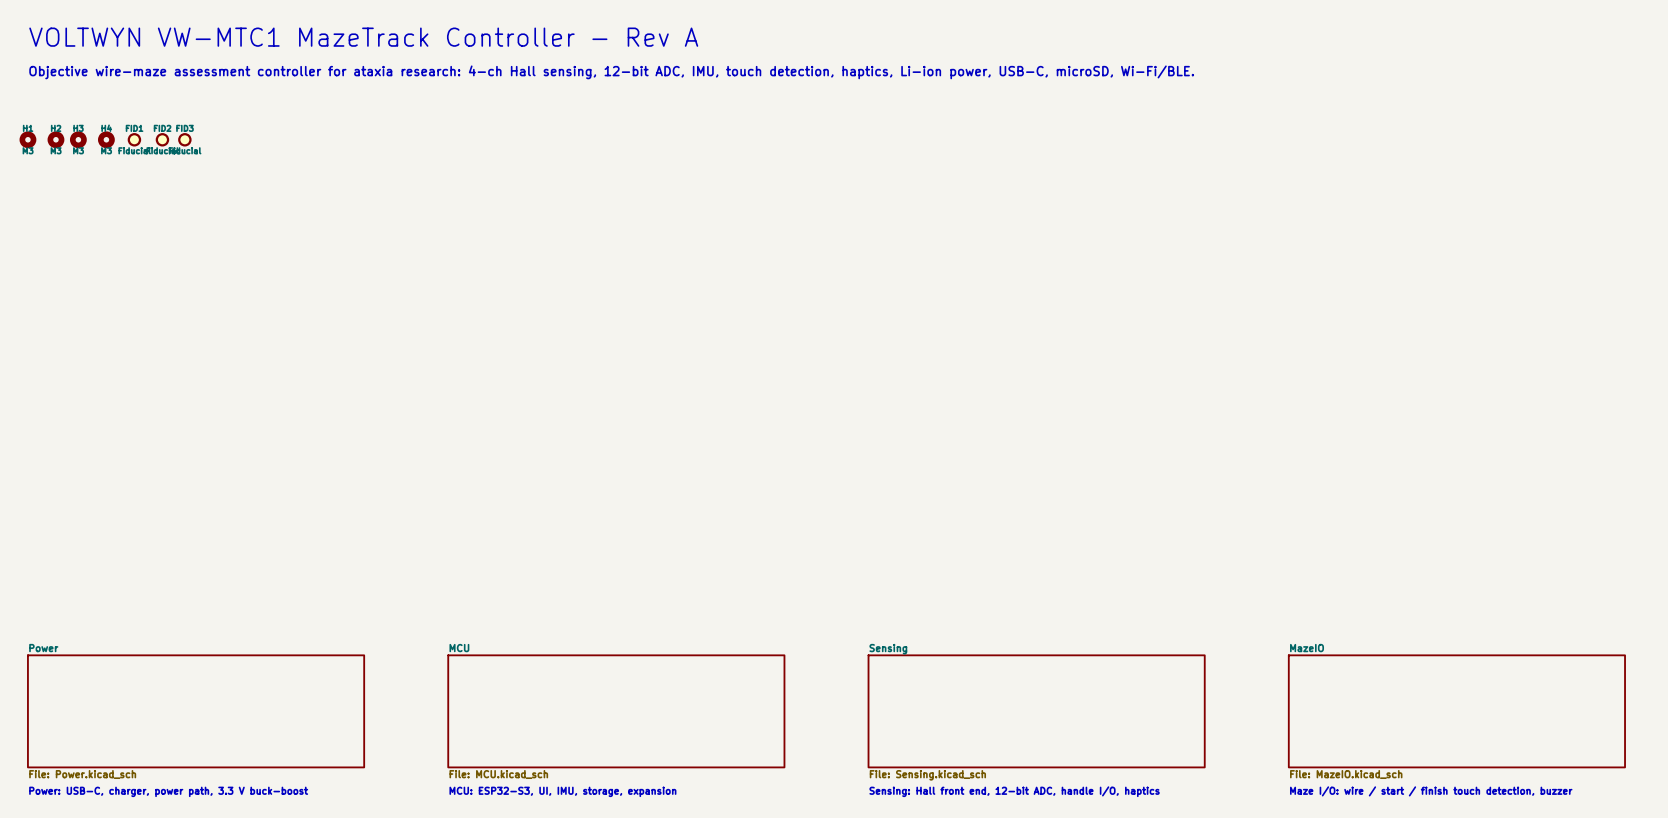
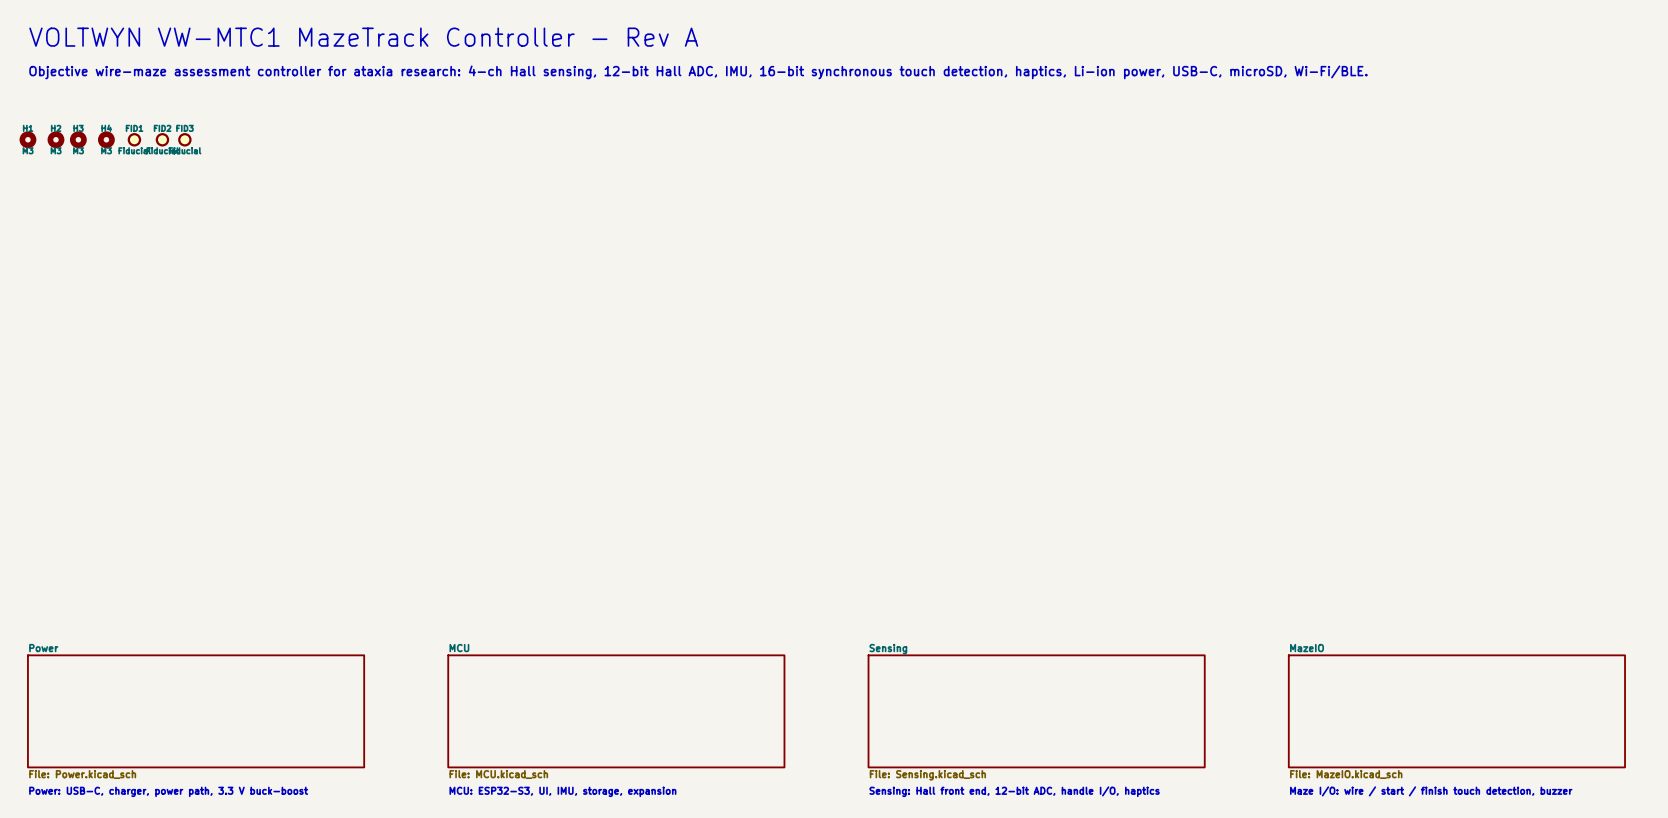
text: Objective wire-maze assessment controller for ataxia research: 4-ch Hall sensing, 12-bit ADC, IMU, touch detection, haptics, Li-ion power, USB-C, microSD, Wi-Fi/BLE. (611, 72) -> Objective wire-maze assessment controller for ataxia research: 4-ch Hall sensing, 12-bit Hall ADC, IMU, 16-bit synchronous touch detection, haptics, Li-ion power, USB-C, microSD, Wi-Fi/BLE. (698, 72)

